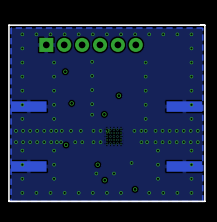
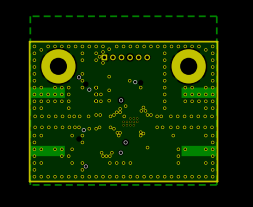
board edge: (204, 25) (8, 25) (8, 201) (204, 201) (204, 25) -> (217, 41) (217, 181) (29, 181) (29, 41) (217, 41)
part: (22, 34) -> none
part: (36, 34) -> none
part: (50, 34) -> none
part: (64, 34) -> none
part: (78, 34) -> none
part: (92, 34) -> none
part: (106, 34) -> none
part: (121, 34) -> none
part: (135, 34) -> none
part: (149, 34) -> none
part: (163, 34) -> none
part: (177, 34) -> none
part: (191, 34) -> none
part: (91, 44) -> none
part: (22, 48) -> none
part: (191, 48) -> none
part: none -> (34, 46)
part: none -> (48, 46)
part: none -> (54, 46)
part: none -> (61, 46)
part: none -> (68, 46)
part: none -> (75, 46)
part: none -> (82, 46)
part: none -> (89, 46)
part: none -> (96, 46)
part: none -> (102, 46)
part: none -> (116, 46)
part: none -> (123, 46)
part: none -> (130, 46)
part: none -> (137, 46)
part: none -> (144, 46)
part: none -> (150, 46)
part: none -> (157, 46)
part: none -> (164, 46)
part: none -> (171, 46)
part: none -> (178, 46)
part: none -> (185, 46)
part: none -> (192, 46)
part: none -> (198, 46)
part: none -> (212, 46)
part: (54, 62) -> none
part: (145, 62) -> none
part: none -> (102, 51)
part: none -> (34, 53)
part: none -> (82, 53)
part: none -> (96, 53)
part: none -> (164, 53)
part: none -> (212, 53)
part: none -> (99, 56)
part: none -> (125, 57)
via position: (65, 71) -> (78, 77)
part: none -> (34, 60)
part: none -> (82, 60)
part: none -> (96, 60)
part: none -> (164, 60)
part: none -> (212, 60)
part: none -> (102, 62)
part: (92, 75) -> none
part: (22, 76) -> none
part: (54, 76) -> none
part: (145, 76) -> none
part: (191, 76) -> none
part: none -> (58, 66)
part: none -> (188, 66)
part: none -> (34, 67)
part: none -> (164, 67)
part: none -> (212, 67)
part: none -> (34, 73)
part: none -> (82, 73)
part: none -> (164, 73)
part: none -> (212, 73)
part: (22, 90) -> none
part: (54, 90) -> none
part: (145, 90) -> none
part: (191, 90) -> none
part: none -> (34, 80)
part: none -> (82, 80)
part: none -> (129, 80)
part: none -> (164, 80)
part: none -> (212, 80)
part: none -> (34, 87)
part: none -> (41, 87)
part: none -> (54, 87)
part: none -> (61, 87)
part: none -> (68, 87)
part: none -> (82, 87)
part: none -> (96, 87)
part: none -> (140, 87)
part: none -> (164, 87)
part: none -> (185, 87)
part: none -> (192, 87)
part: none -> (205, 87)
part: none -> (212, 87)
part: (22, 104) -> none
part: (54, 104) -> none
part: (145, 104) -> none
part: (191, 104) -> none
part: none -> (34, 94)
part: none -> (41, 94)
part: none -> (48, 94)
part: none -> (54, 94)
part: none -> (61, 94)
part: none -> (68, 94)
part: none -> (96, 94)
part: none -> (100, 94)
part: none -> (164, 94)
part: none -> (185, 94)
part: none -> (192, 94)
part: none -> (198, 94)
part: none -> (205, 94)
part: none -> (212, 94)
part: none -> (34, 101)
part: none -> (41, 101)
part: none -> (48, 101)
part: none -> (54, 101)
part: none -> (61, 101)
part: none -> (68, 101)
part: none -> (96, 101)
part: none -> (100, 101)
part: none -> (164, 101)
part: none -> (185, 101)
part: none -> (192, 101)
part: none -> (198, 101)
part: none -> (205, 101)
part: none -> (212, 101)
part: (22, 118) -> none
part: (54, 118) -> none
part: (145, 118) -> none
part: (191, 118) -> none
part: none -> (125, 106)
part: none -> (143, 107)
part: none -> (34, 108)
part: none -> (41, 108)
part: none -> (68, 108)
part: none -> (164, 108)
part: none -> (205, 108)
part: none -> (212, 108)
part: none -> (120, 108)
part: none -> (141, 110)
part: none -> (145, 110)
part: none -> (116, 112)
part: none -> (120, 112)
part footprint: [105, 128, 122, 145] -> [129, 120, 132, 123]
part: none -> (96, 115)
part: none -> (100, 115)
part: none -> (113, 115)
part: none -> (147, 115)
part: none -> (150, 115)
part: (80, 130) -> none
part: (100, 130) -> none
part: (134, 130) -> none
part: none -> (130, 118)
part: none -> (133, 118)
part: none -> (137, 118)
part: none -> (123, 121)
part: none -> (126, 121)
part: none -> (133, 121)
part: none -> (137, 121)
part: none -> (123, 125)
part: none -> (126, 125)
part: none -> (130, 125)
part: none -> (133, 125)
part: (75, 142) -> none
part: (100, 142) -> none
part: none -> (89, 128)
part: none -> (96, 128)
part: none -> (113, 128)
part: none -> (117, 132)
part: none -> (120, 132)
part: none -> (140, 132)
part: none -> (143, 133)
part: none -> (34, 135)
part: none -> (82, 135)
part: none -> (118, 135)
part: none -> (140, 135)
part: none -> (212, 135)
part: none -> (34, 142)
part: none -> (82, 142)
via: none -> (125, 142)
part: none -> (212, 142)
part: none -> (34, 149)
part: none -> (54, 149)
part: none -> (61, 149)
via: (97, 164) -> none
part: (157, 164) -> none
part: none -> (178, 149)
part: none -> (185, 149)
part: none -> (212, 149)
part: none -> (101, 152)
part: none -> (111, 152)
via: none -> (120, 152)
part: none -> (34, 156)
part: none -> (61, 156)
part: none -> (68, 156)
part: none -> (102, 156)
part: none -> (106, 156)
part: none -> (109, 156)
part: none -> (178, 156)
part: none -> (212, 156)
part: (96, 173) -> none
part: (113, 173) -> none
part: none -> (34, 163)
part: none -> (82, 163)
part: none -> (109, 163)
part: none -> (116, 163)
part: none -> (123, 163)
part: none -> (130, 163)
part: (157, 178) -> none
part: none -> (178, 163)
part: none -> (212, 163)
via: (104, 180) -> none
via: none -> (85, 166)
part: none -> (34, 169)
part: none -> (82, 169)
part: none -> (212, 169)
via: (135, 189) -> none
part: none -> (34, 176)
part: none -> (48, 176)
part: none -> (61, 176)
part: none -> (75, 176)
part: none -> (89, 176)
part: none -> (102, 176)
part: none -> (116, 176)
part: none -> (130, 176)
part: none -> (144, 176)
part: none -> (150, 176)
part: none -> (157, 176)
part: none -> (171, 176)
part: none -> (185, 176)
part: none -> (198, 176)
part: none -> (212, 176)

